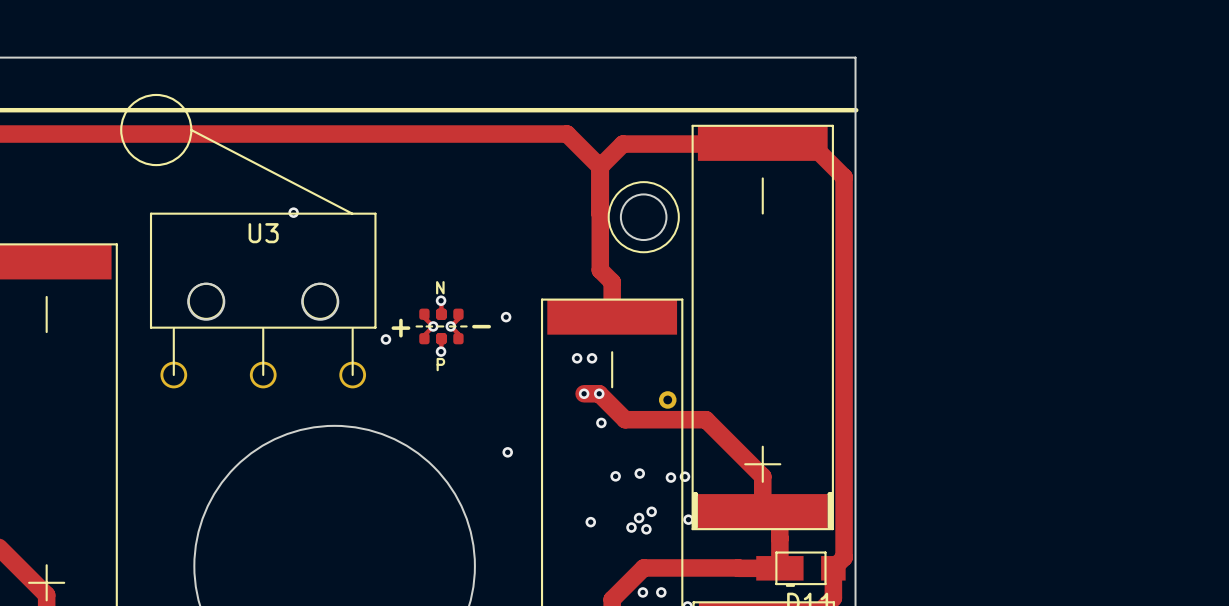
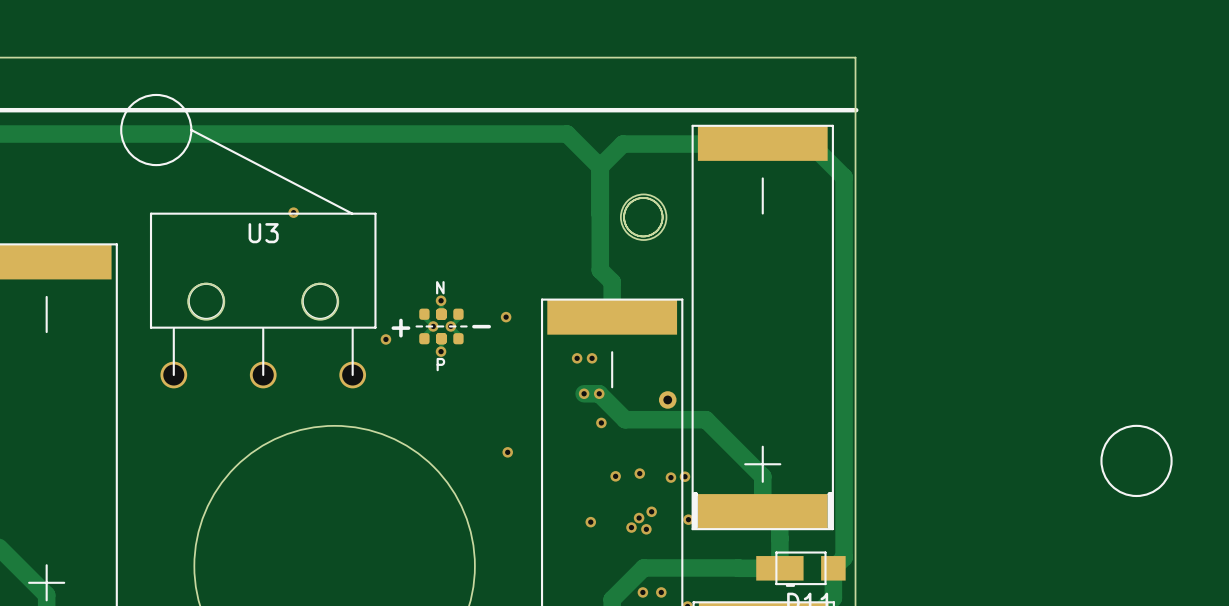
drawing: [607, 181, 680, 254] -> none
round board edge: none -> [623, 197, 664, 238]
drawing: none -> [1100, 424, 1173, 498]

